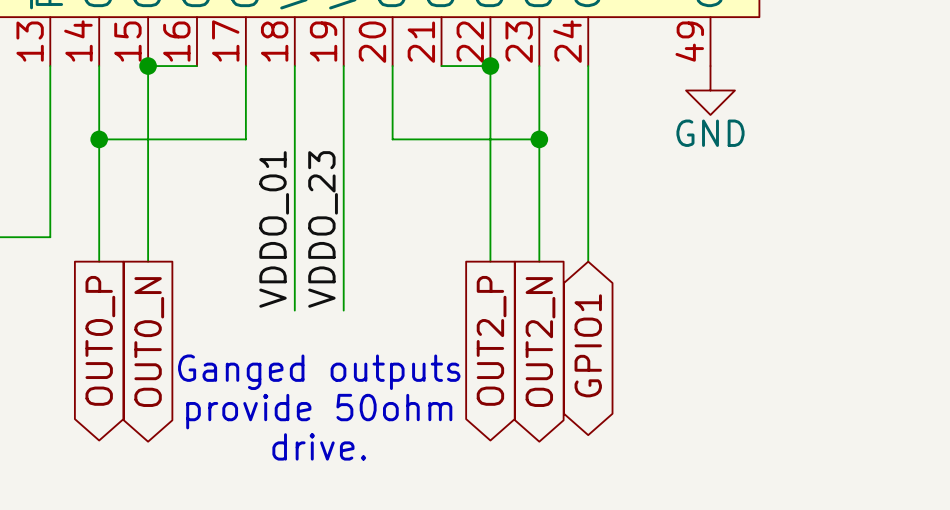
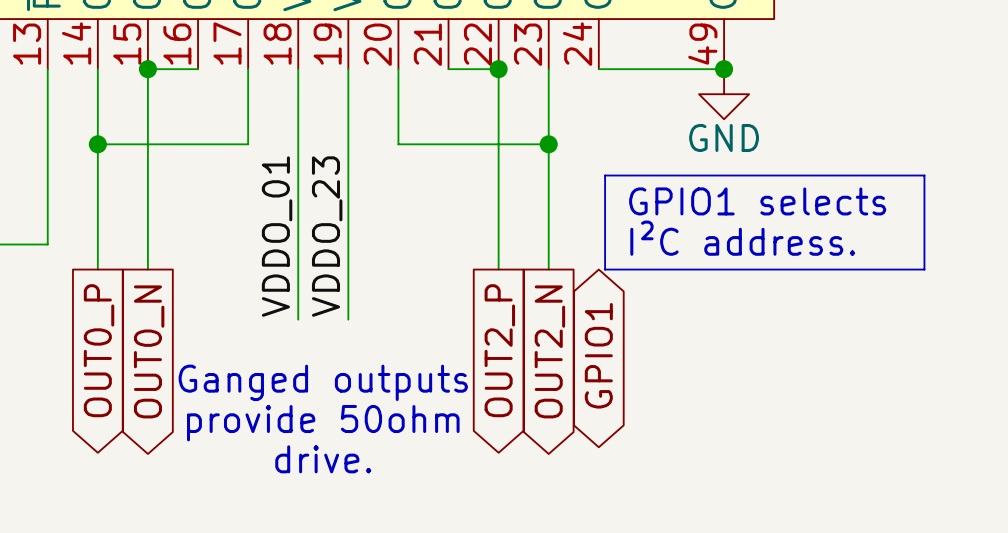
wire: (588, 66) (588, 261) -> (598, 69) (724, 69)
junction: none -> (724, 69)
line: none -> (605, 175) (924, 175) (924, 269) (605, 269) (605, 175)
text: none -> GPIO1 selects (757, 201)
text: none -> I²C address. (742, 238)

